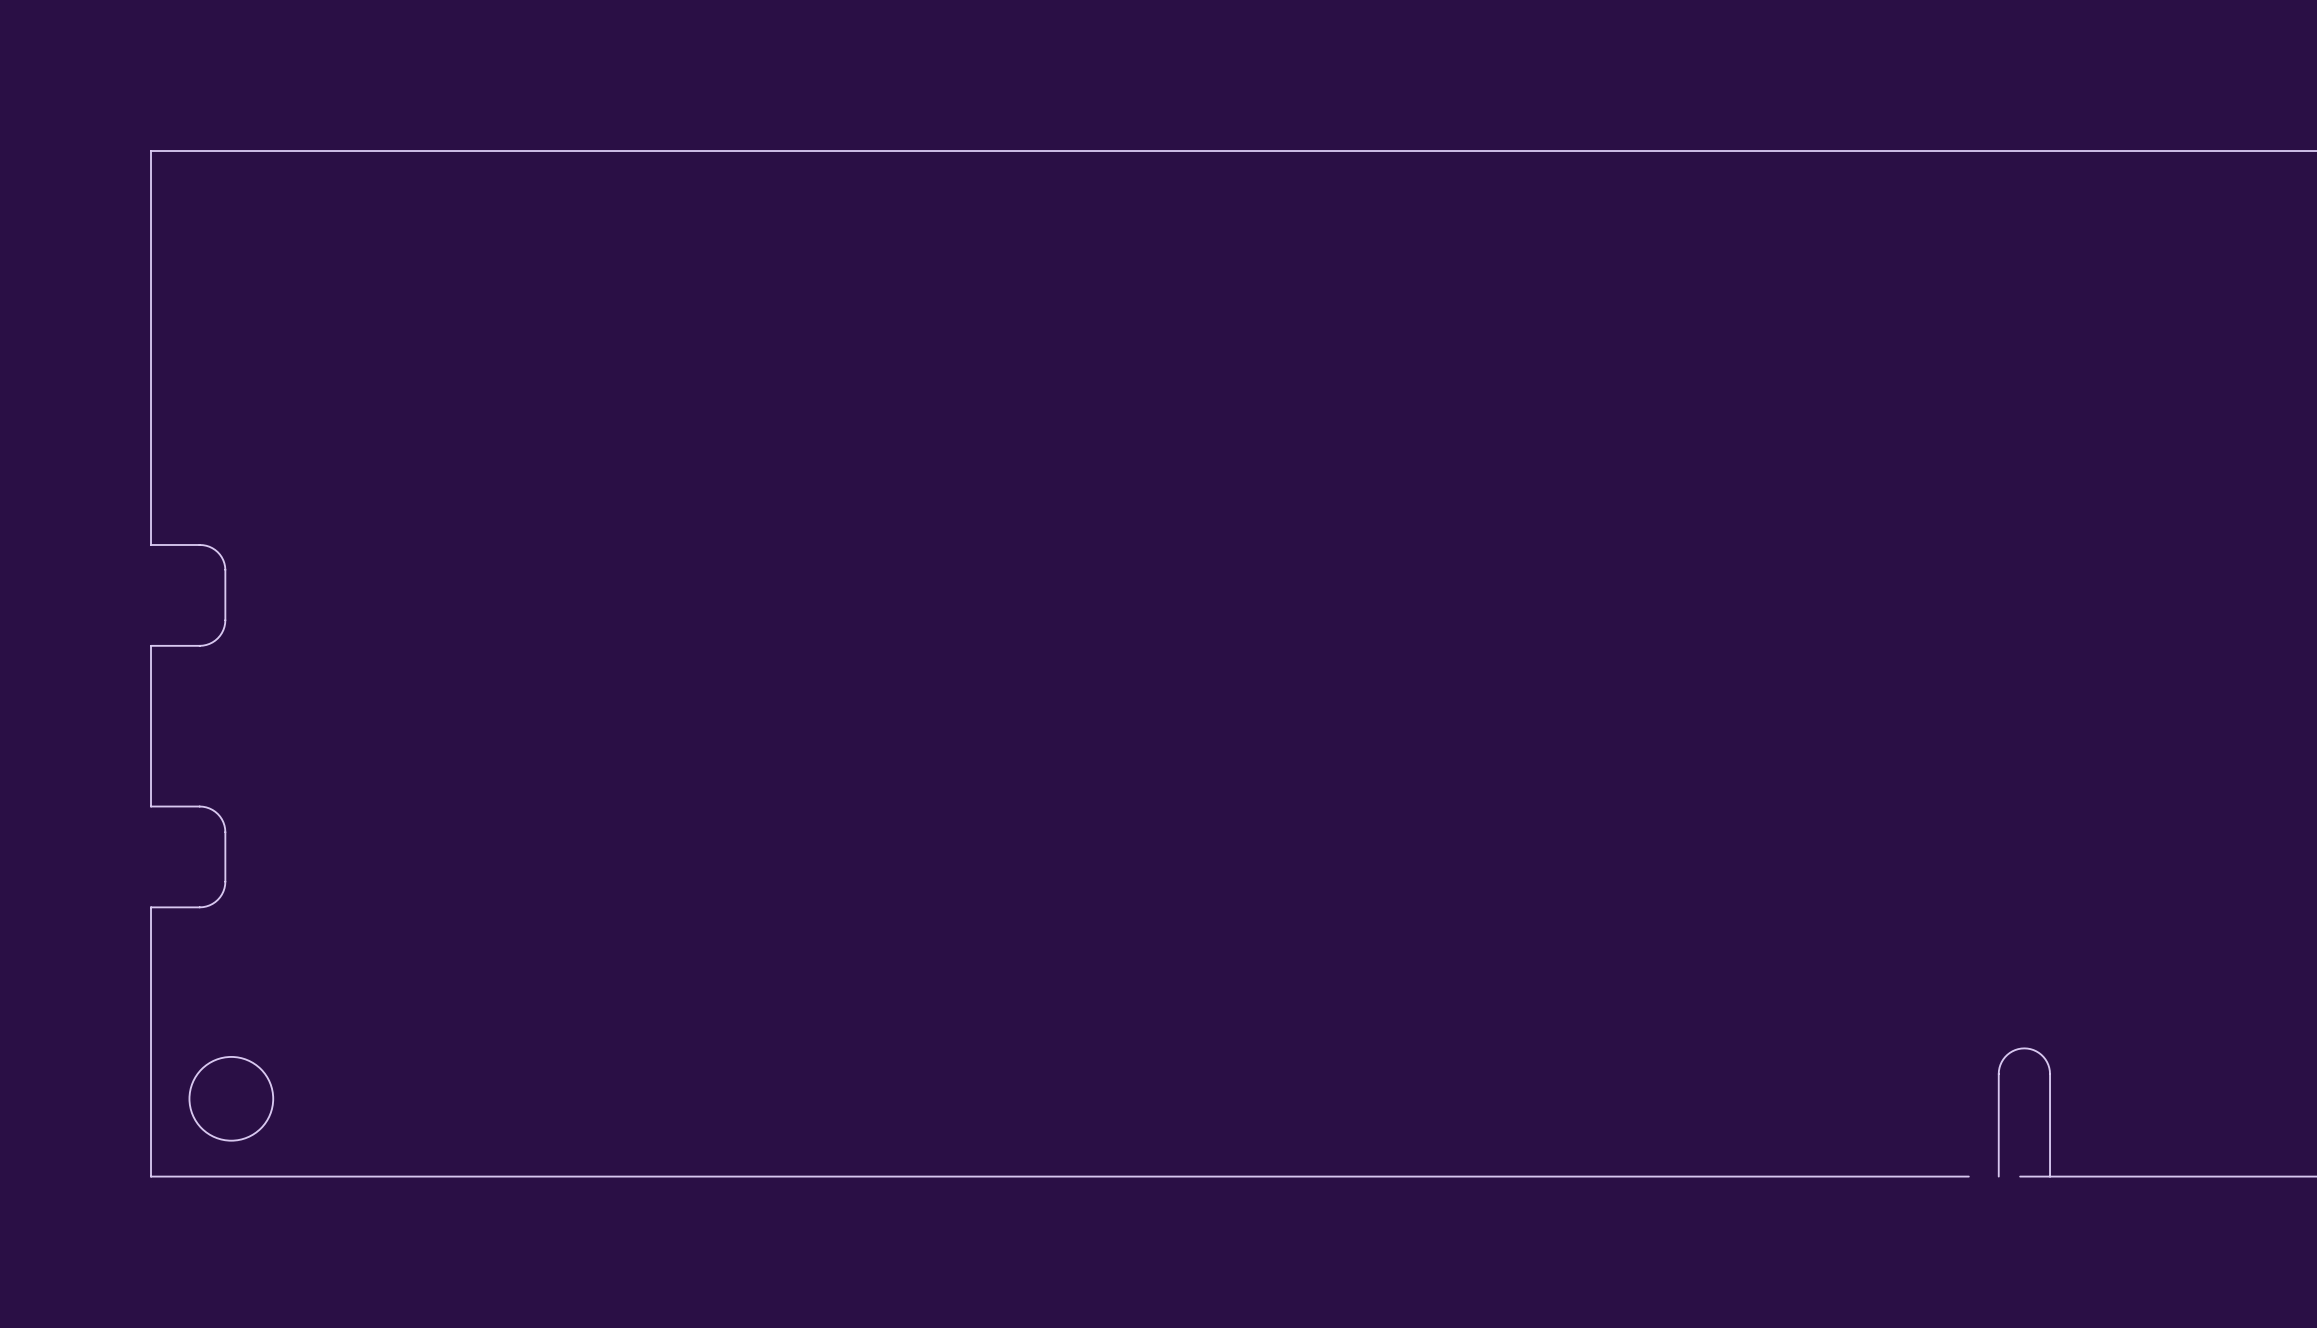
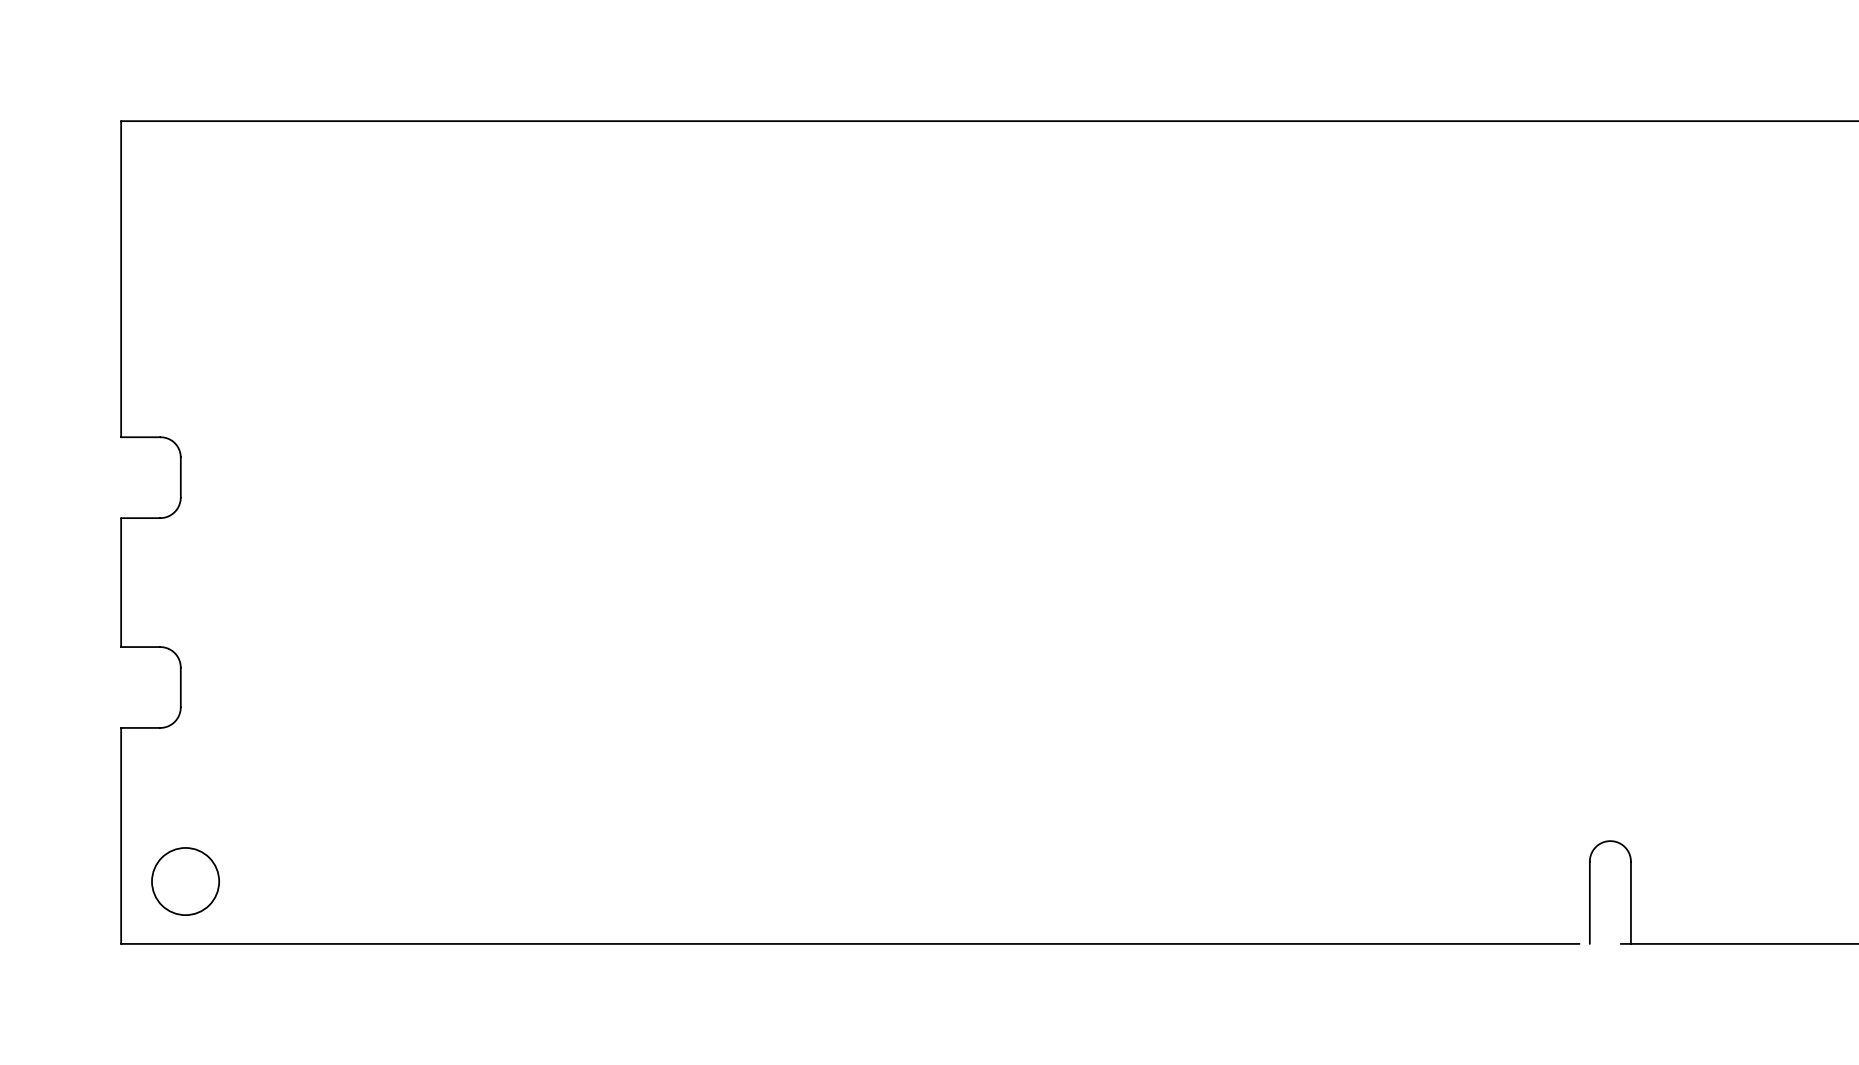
board edge: (1998, 1176) (1999, 1067) (2007, 1054) (2015, 1050) (2024, 1048) (2033, 1050) (2041, 1054) (2049, 1067) (2050, 1176) -> (1589, 943) (1590, 856) (1598, 844) (1610, 841) (1622, 844) (1630, 856) (1630, 943)

